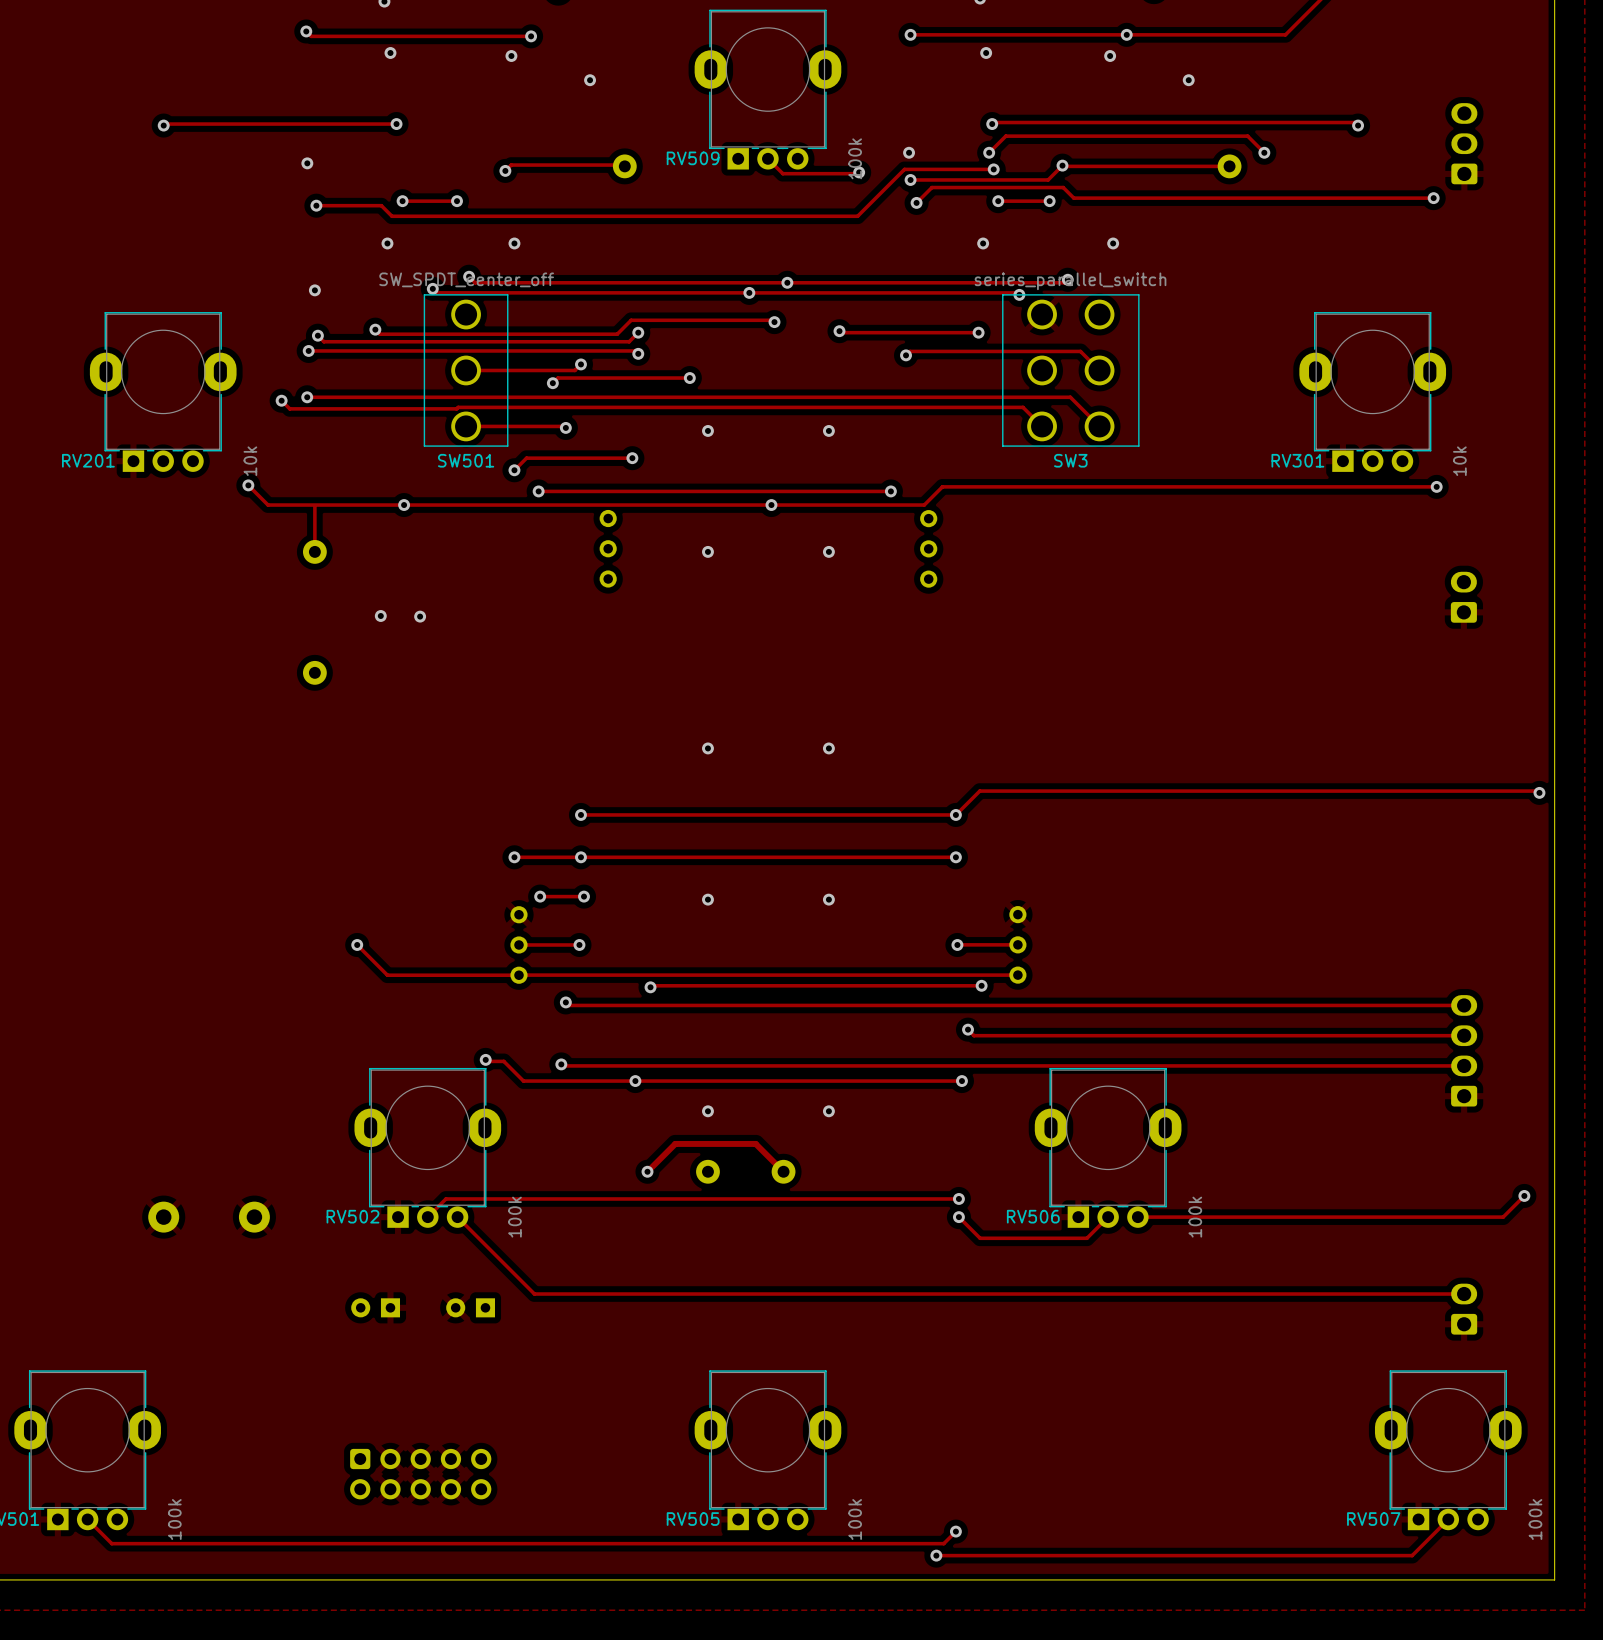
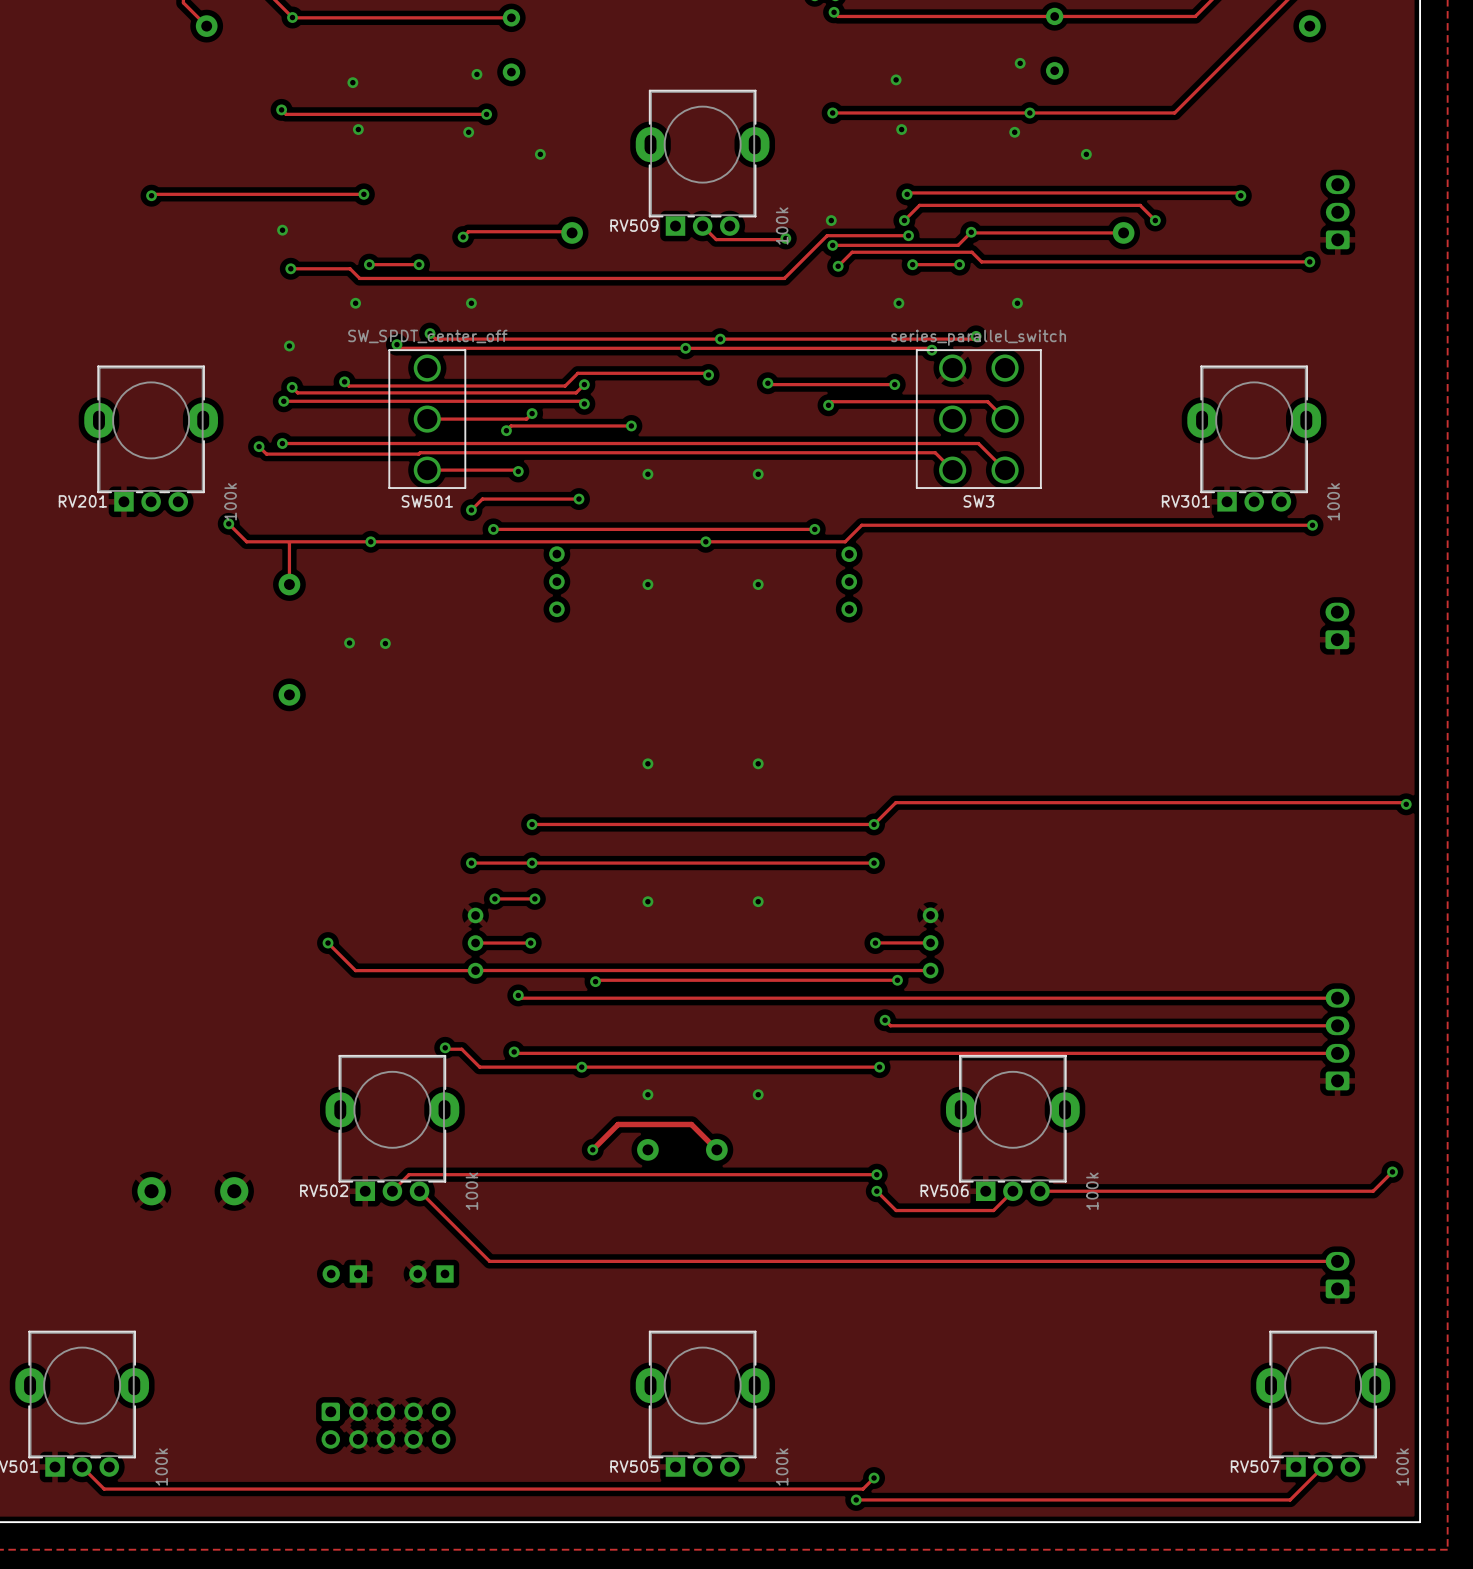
RV201 value: 10k (250, 461) -> 100k (230, 501)
RV301 value: 10k (1459, 461) -> 100k (1333, 501)

